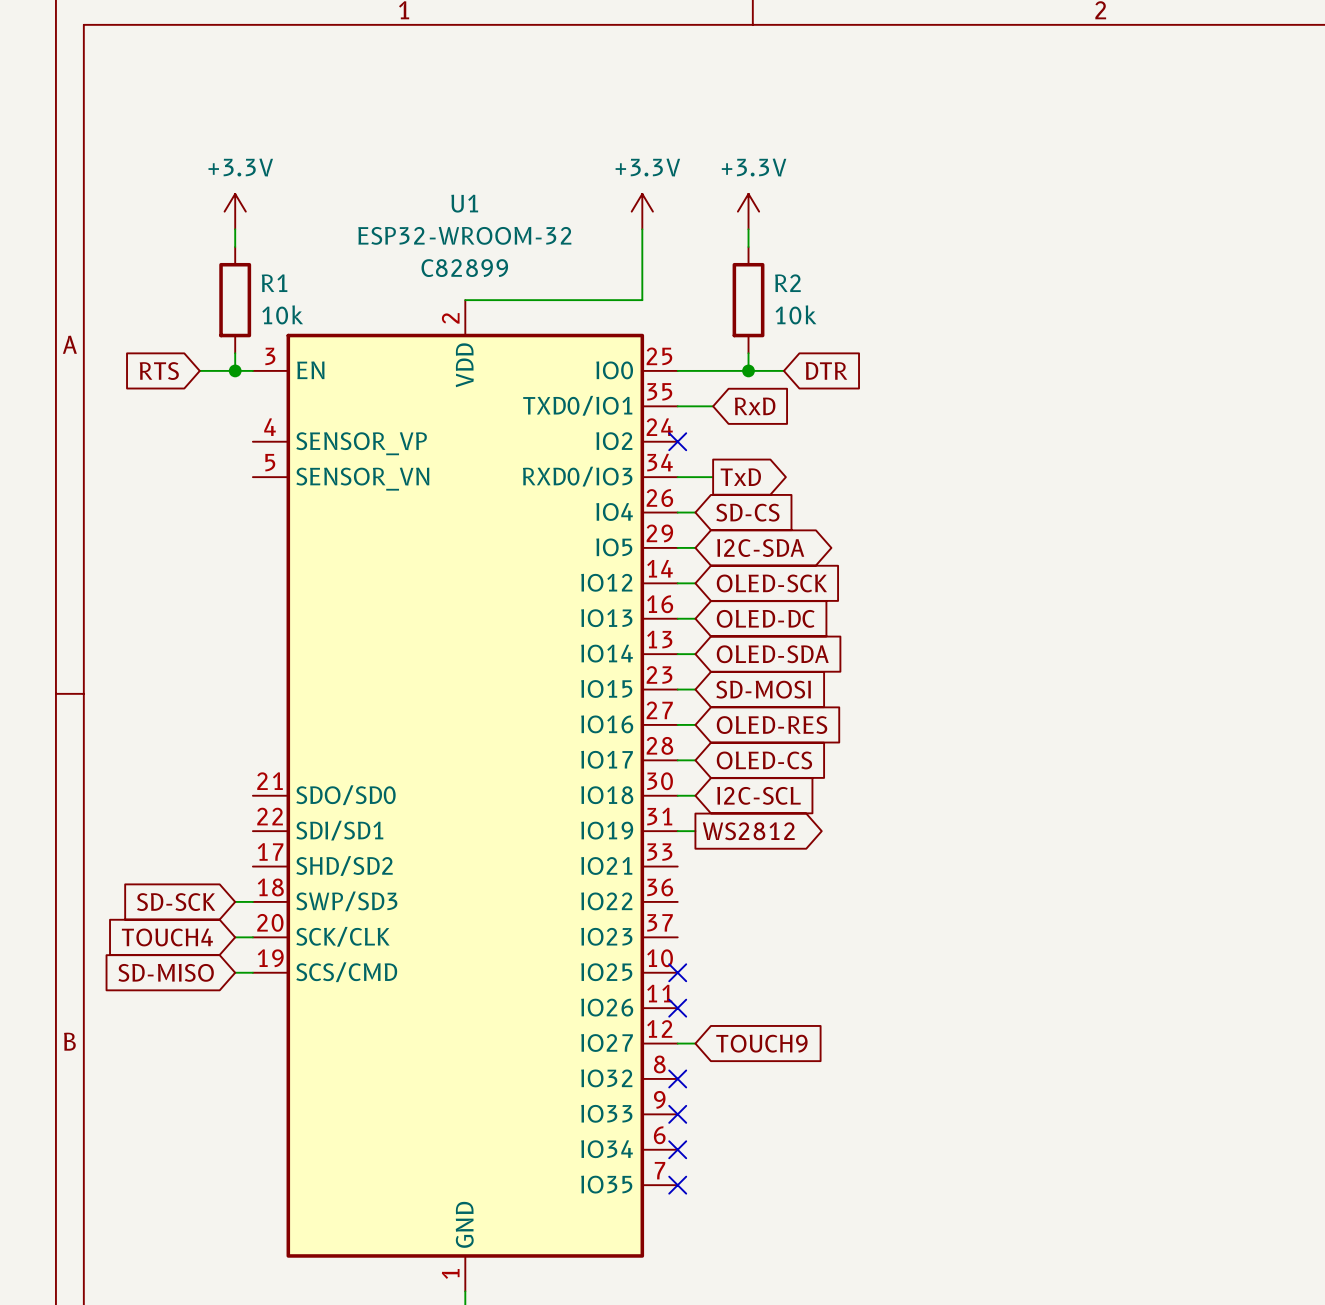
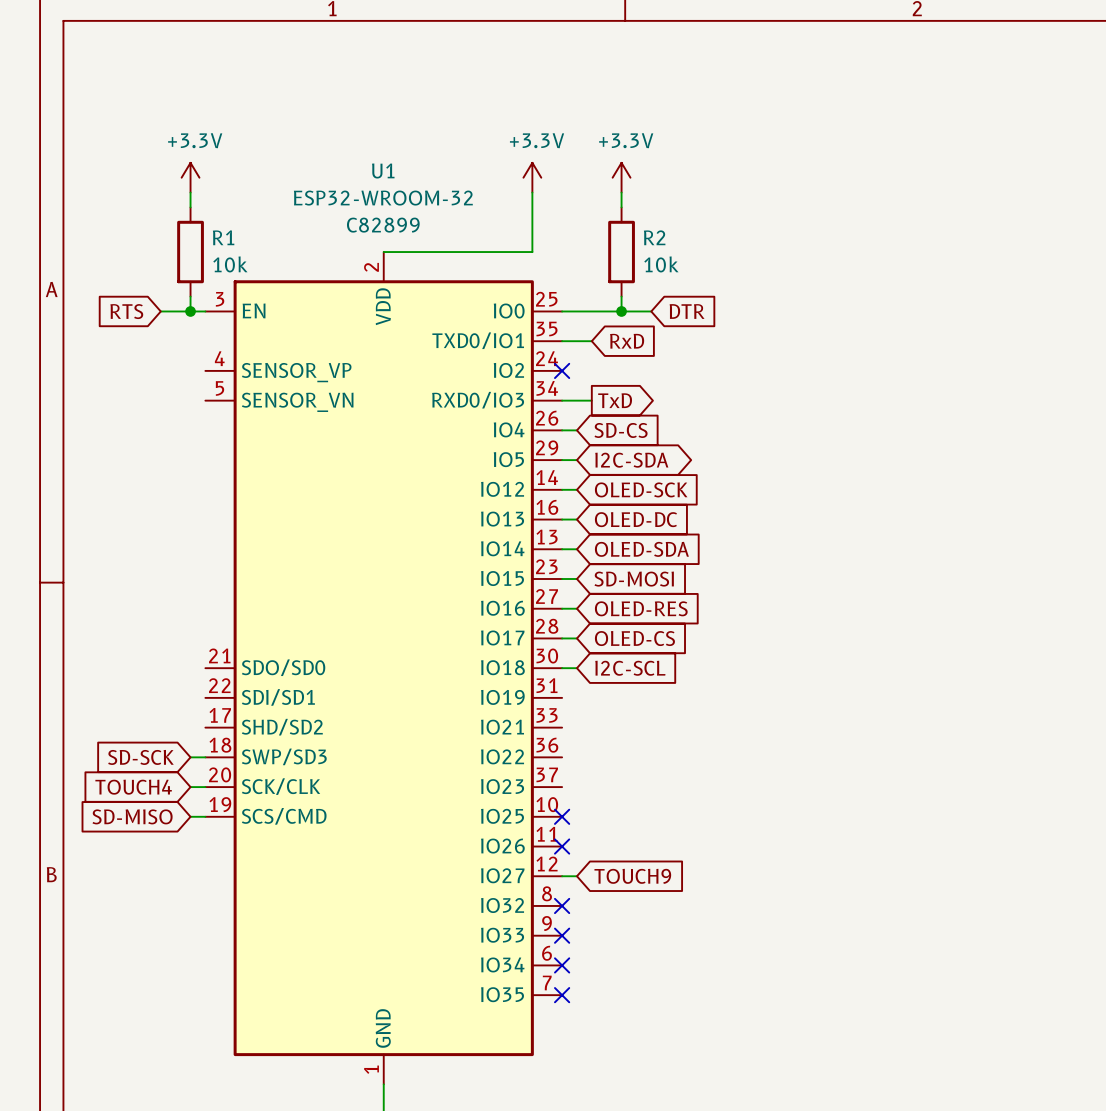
wire: (677, 831) (695, 831) -> none
global label: WS2812 (748, 831) -> none

